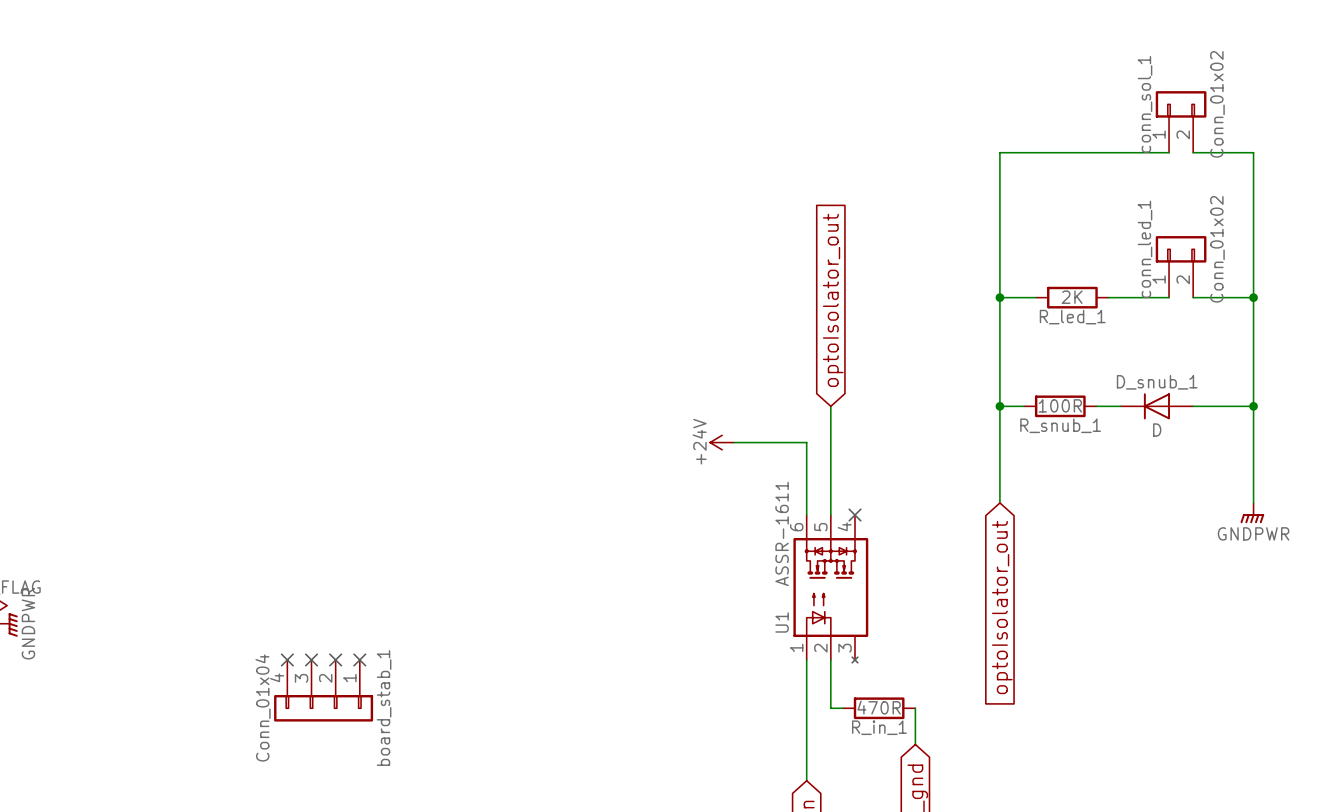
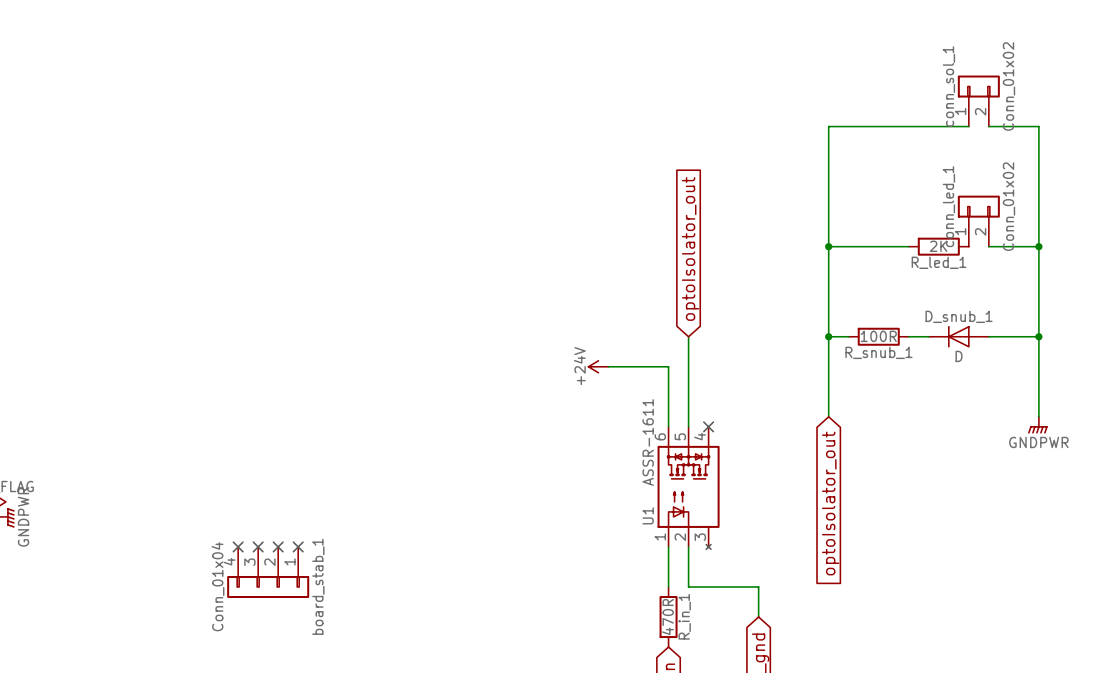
R_led_1 position: (1072, 297) -> (938, 246)
wire: (1108, 297) (1169, 297) -> (858, 246) (908, 246)
R_in_1 rotation: 0° (879, 708) -> 90° clockwise (668, 617)
R_in_1 position: (879, 708) -> (668, 617)
R_in_1 name position: R_in_1 (879, 727) -> R_in_1 (684, 616)

